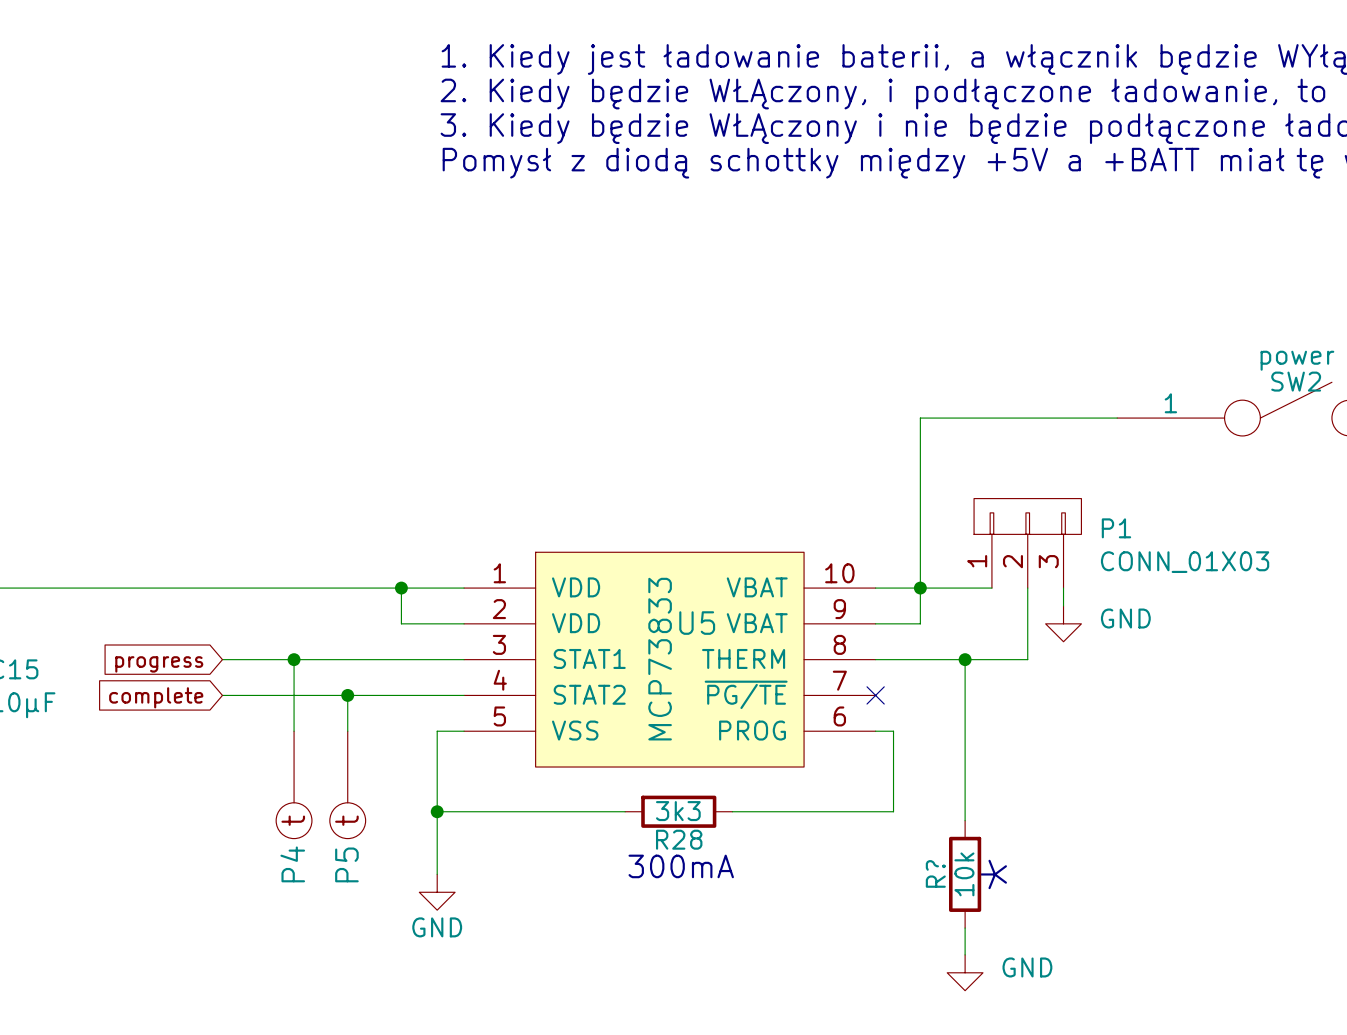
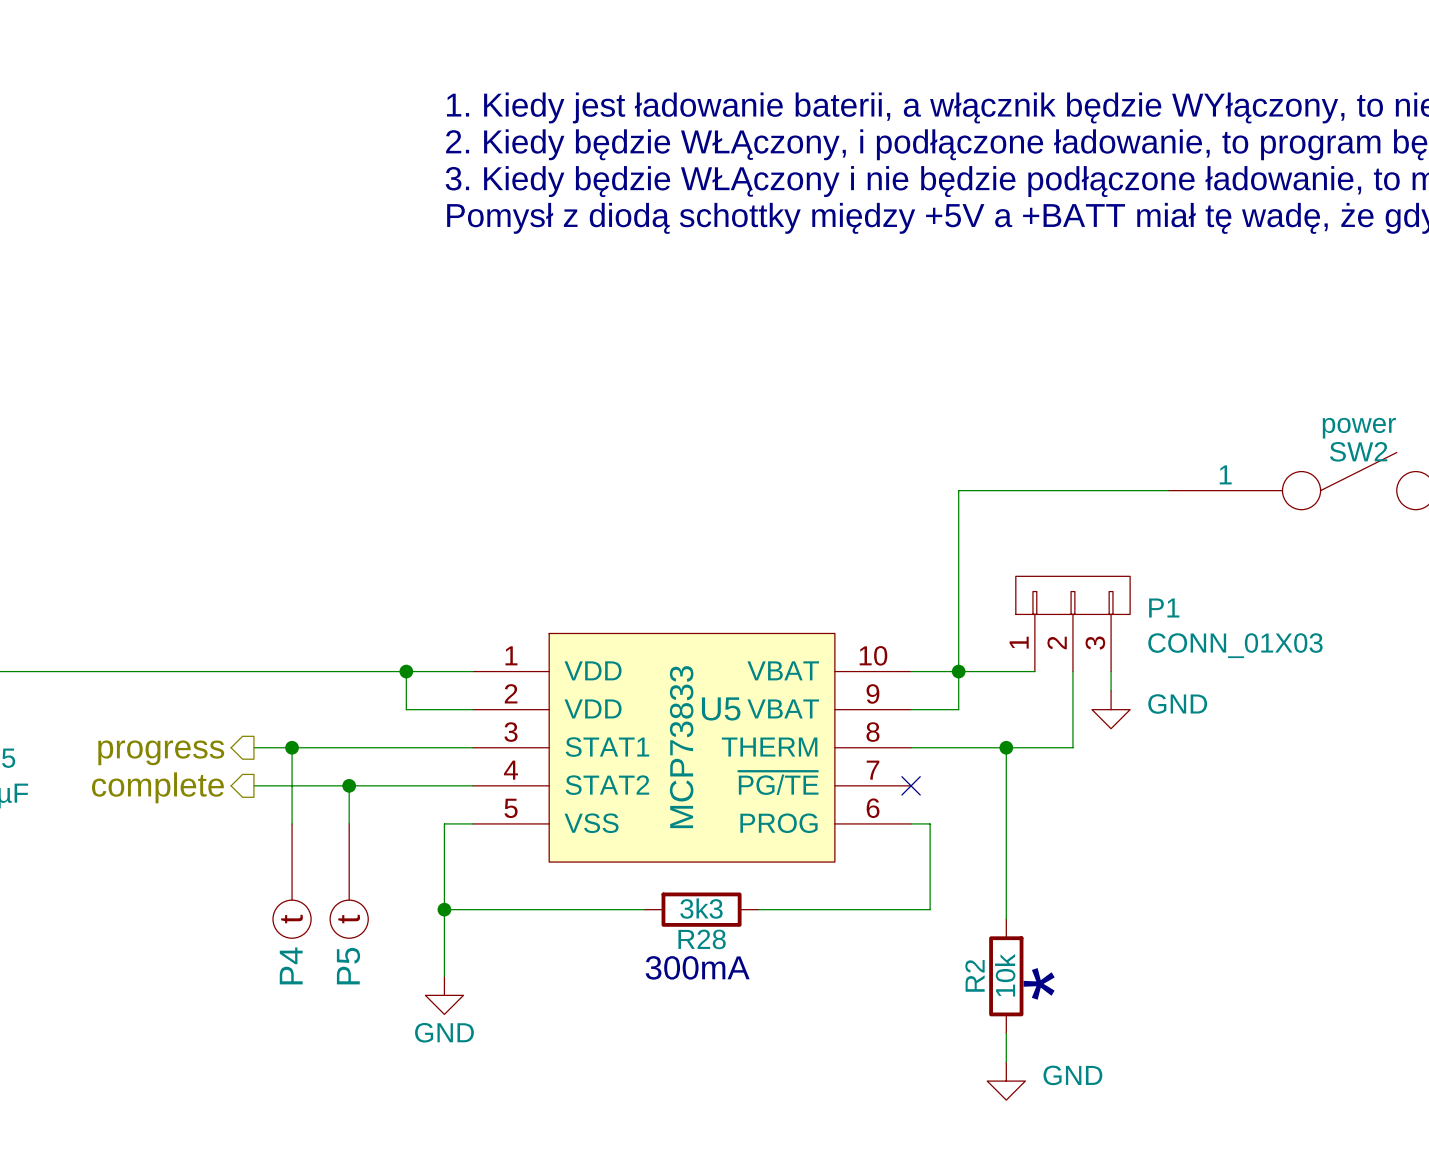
wire: (222, 659) (258, 659) -> none
global label: progress (159, 664) -> none
hierarchical label: none -> progress (161, 752)
wire: (222, 695) (258, 695) -> none
global label: complete (156, 697) -> none
hierarchical label: none -> complete (157, 787)
R? name: R? (935, 873) -> R2 (974, 975)

